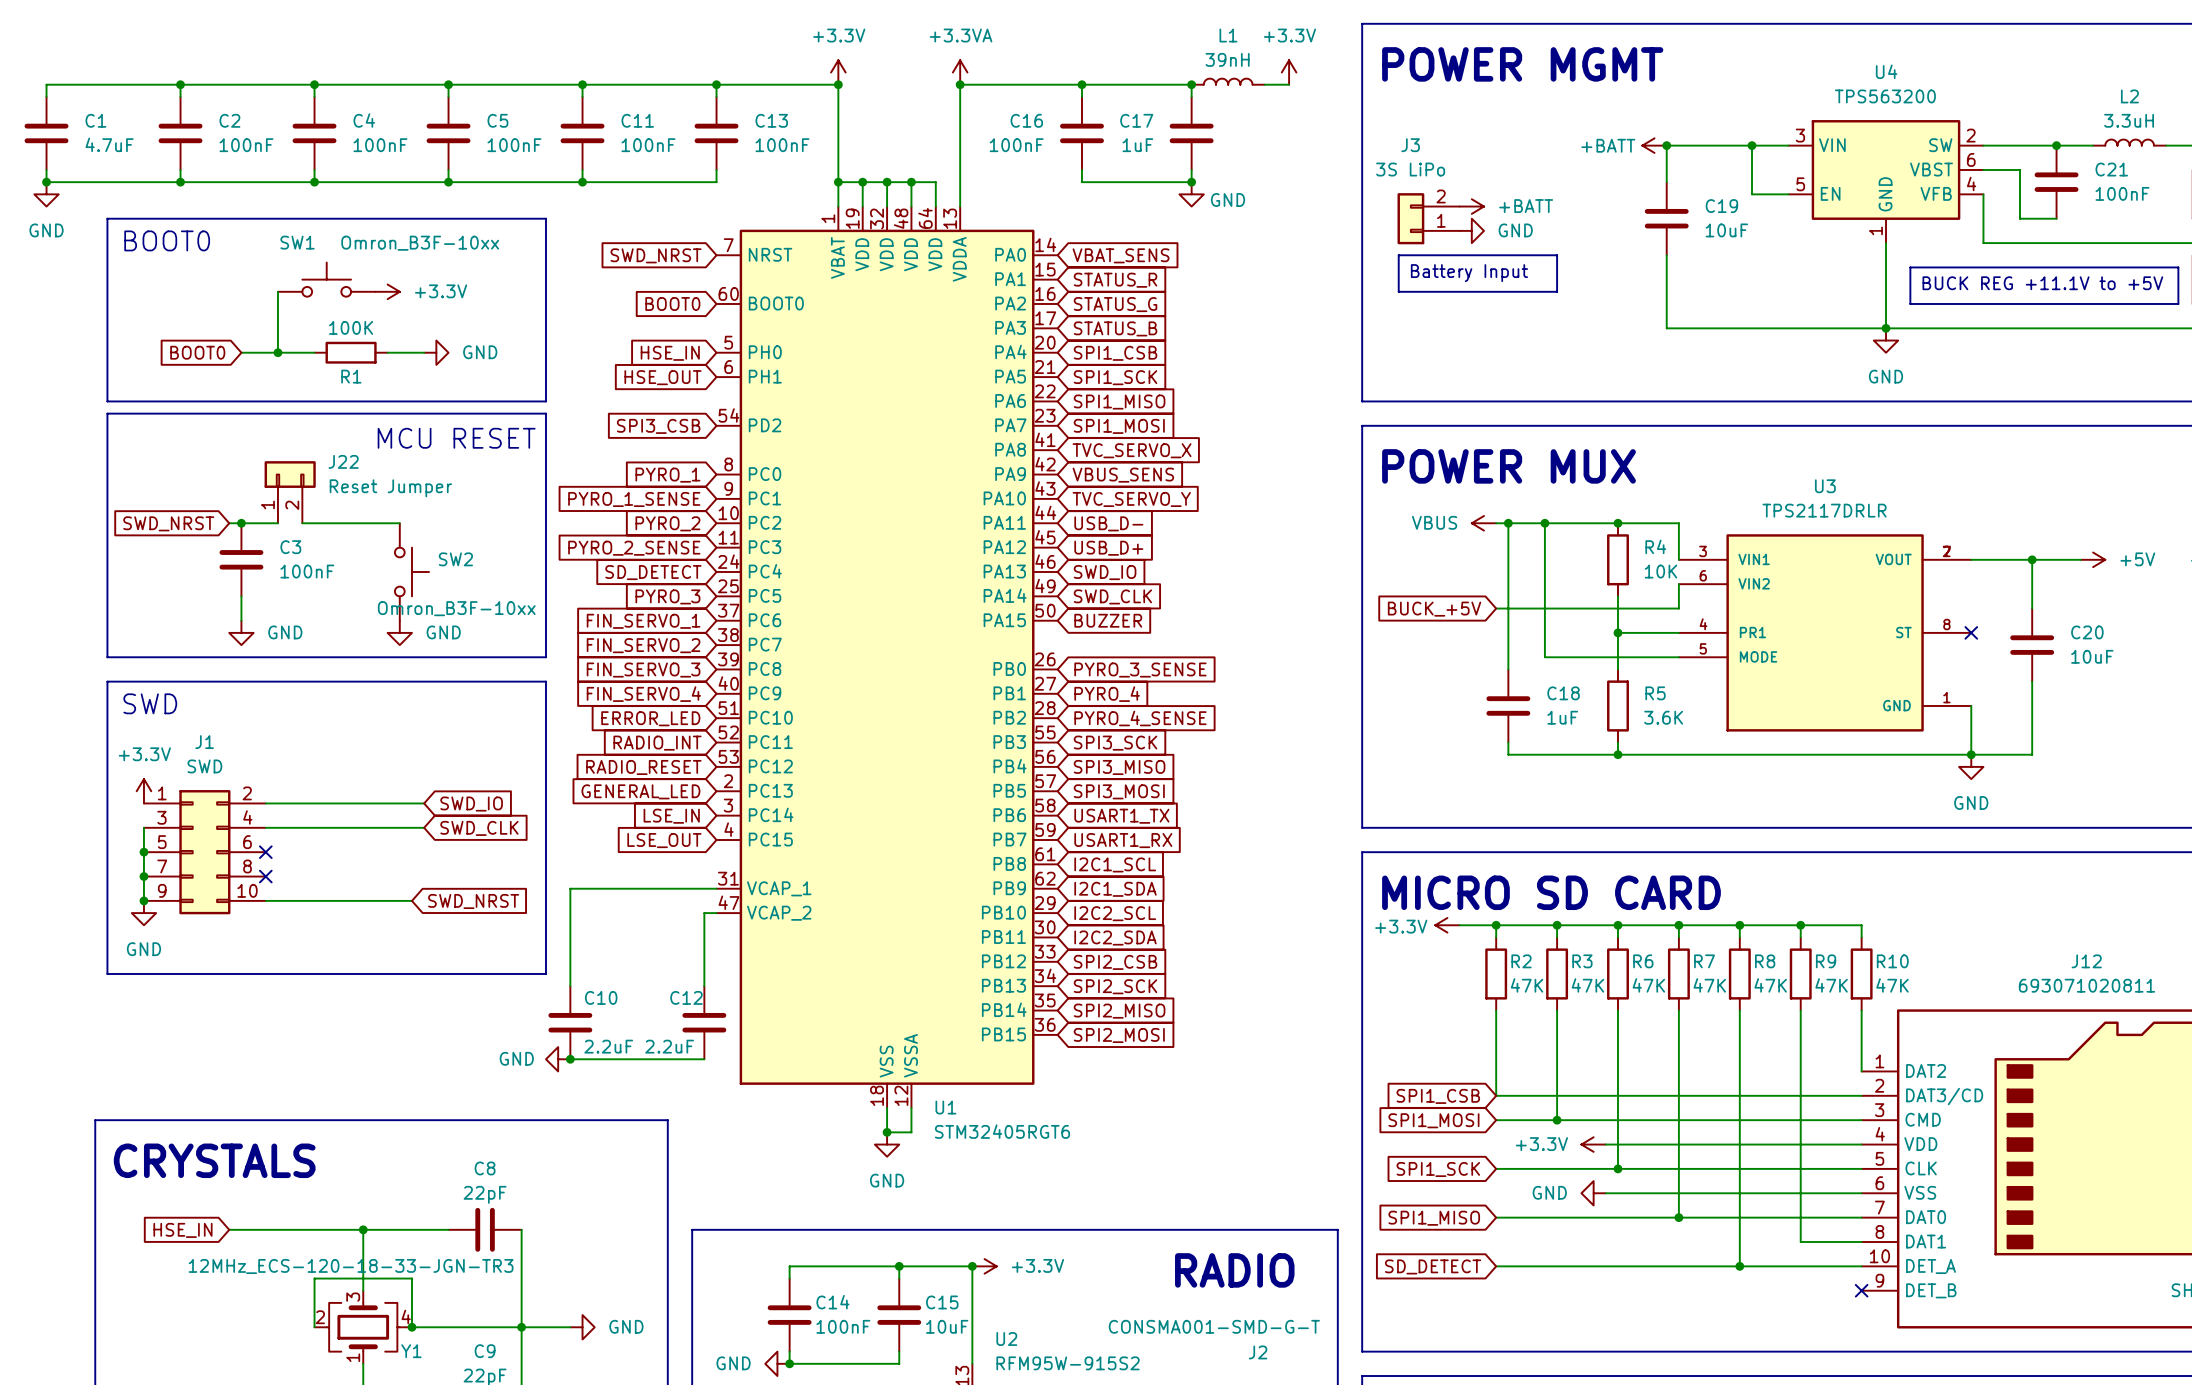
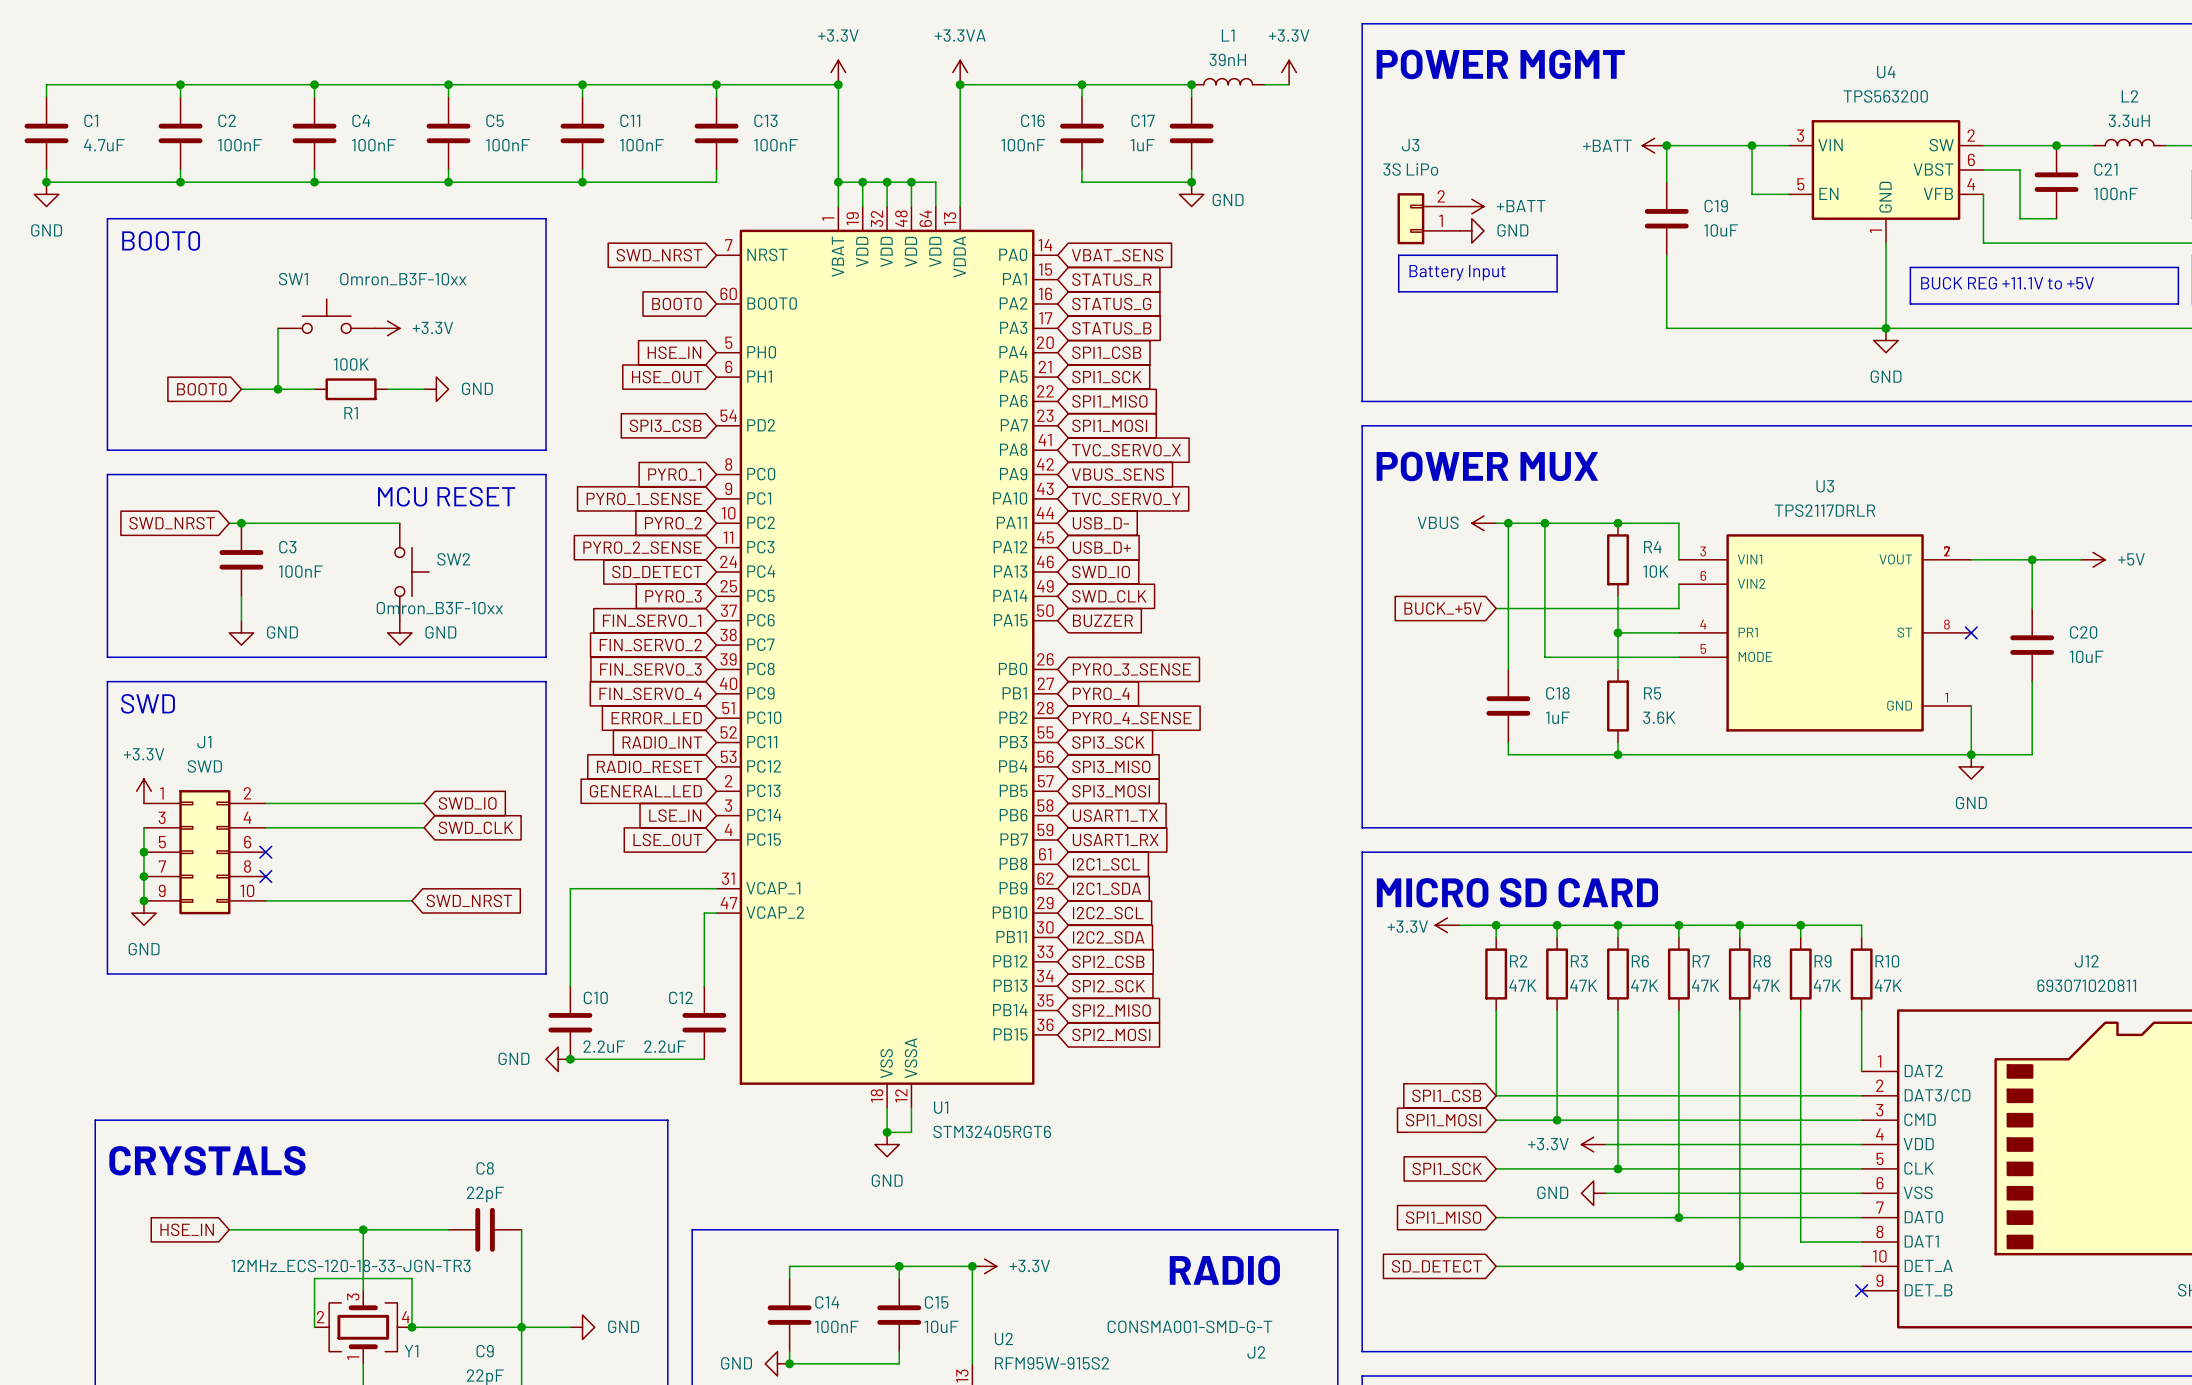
SW1 position: (326, 279) -> (326, 316)
wire: (277, 291) (277, 328) -> (277, 352) (277, 389)
power symbol position: +3.3V (387, 291) -> +3.3V (387, 328)
global label position: BOOT0 (197, 352) -> BOOT0 (201, 389)
wire: (241, 352) (314, 352) -> (241, 389) (314, 389)
junction position: (277, 352) -> (277, 389)
R1 position: (351, 352) -> (351, 389)
wire: (387, 352) (424, 352) -> (387, 389) (424, 389)
power symbol position: GND (436, 352) -> GND (436, 389)
line: (107, 401) (545, 401) -> (107, 401) (107, 413)
line: (107, 413) (545, 413) -> (545, 401) (545, 413)
text position: MCU RESET (456, 438) -> MCU RESET (446, 496)
line: (107, 450) (107, 474) -> (107, 450) (545, 450)
line: (545, 450) (545, 474) -> (107, 474) (545, 474)
J22: Reset Jumper (290, 492) -> none
wire: none -> (277, 523) (302, 523)

